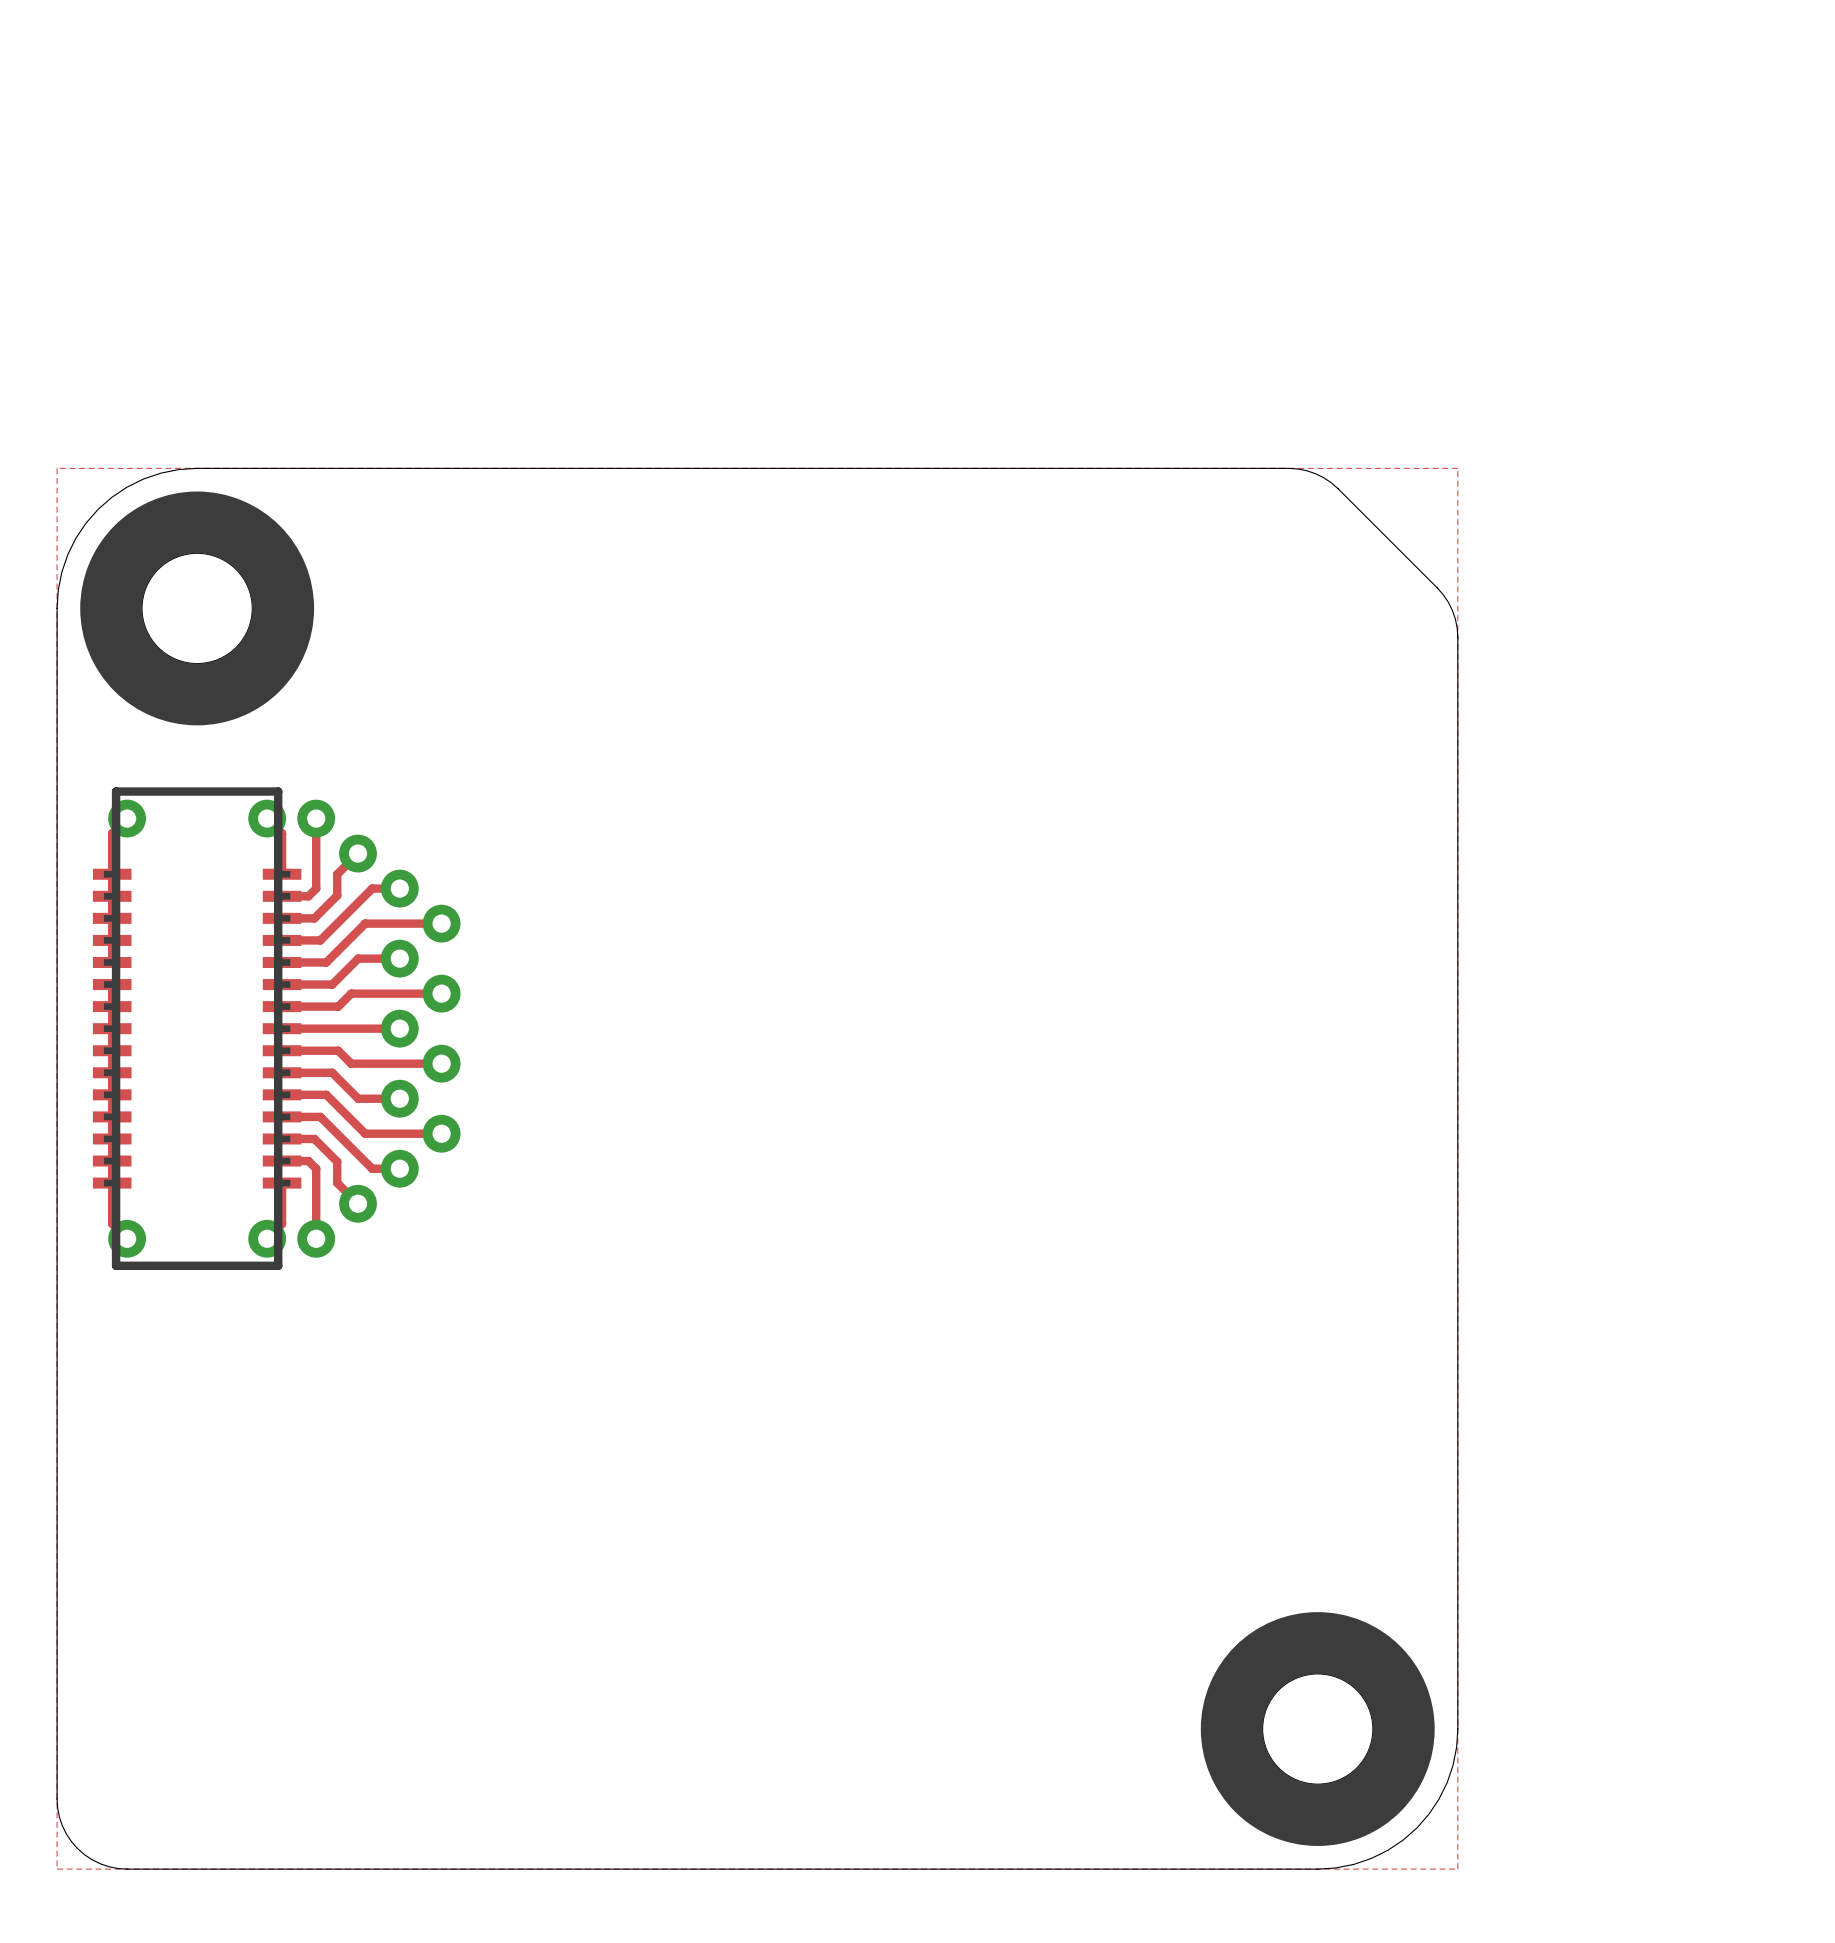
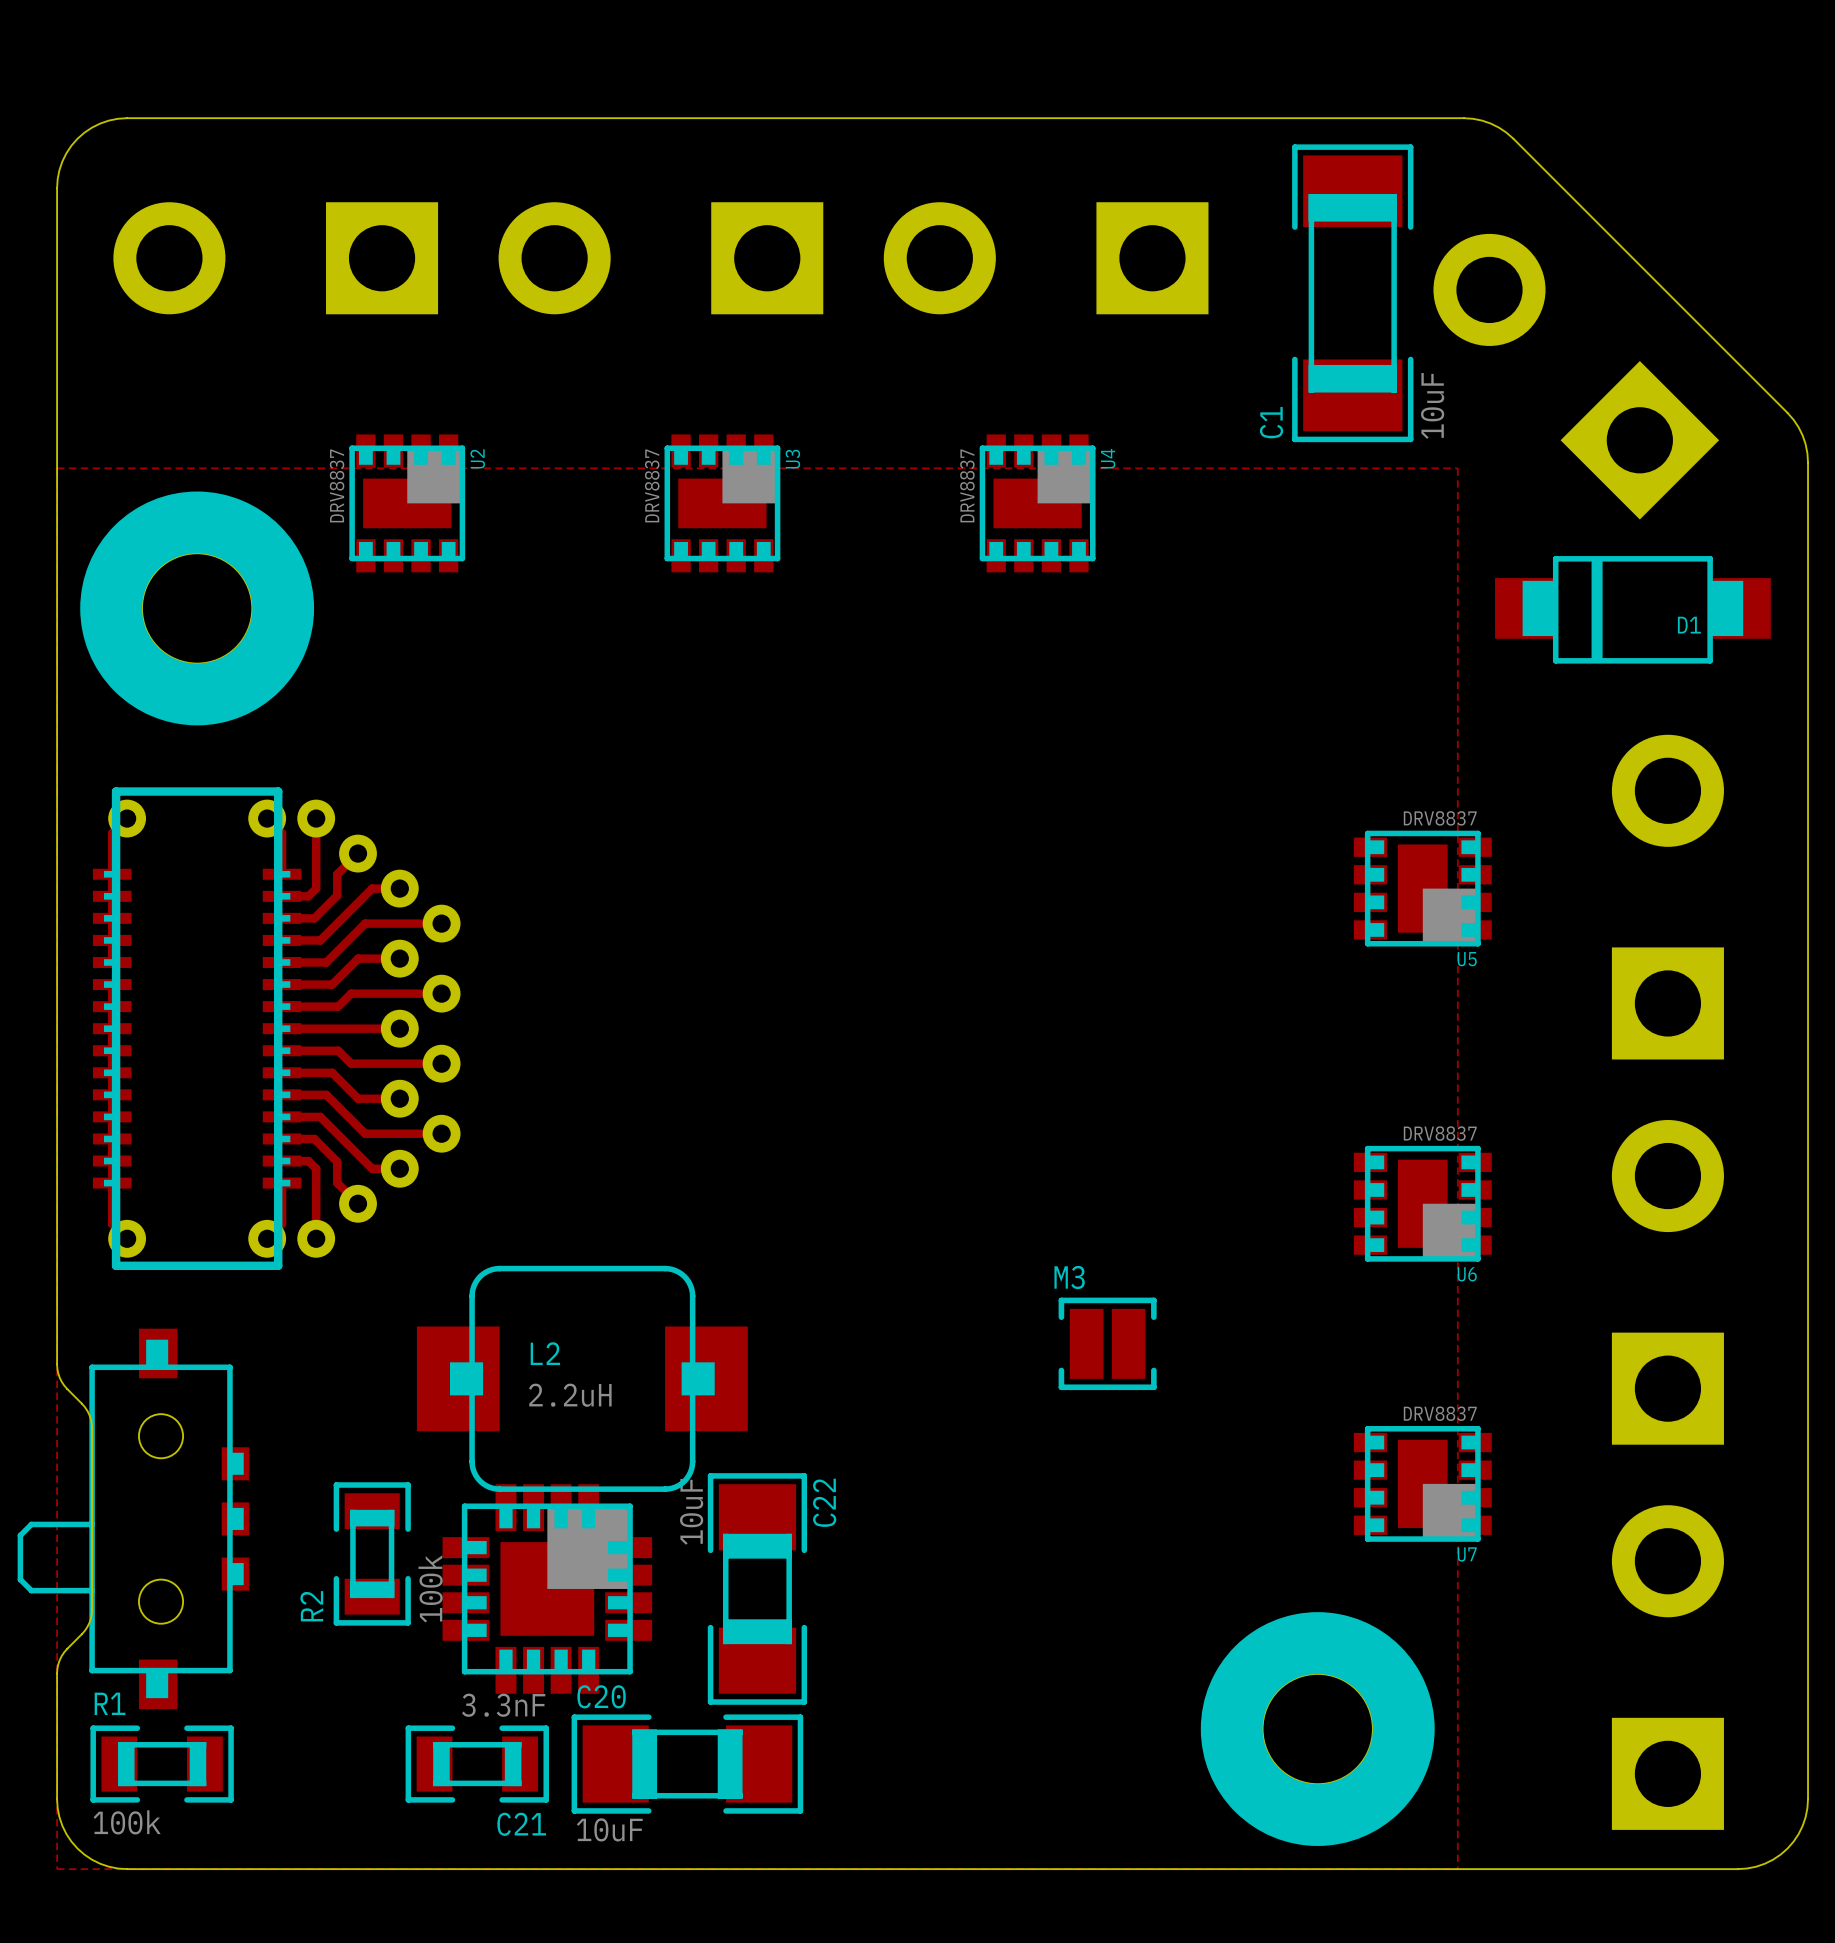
part: none -> (275, 258)
part: none -> (660, 258)
part: none -> (1046, 258)
C1: none -> 10uF (1352, 293)
part: none -> (1576, 376)
U2: none -> DRV8837 (407, 503)
U3: none -> DRV8837 (722, 503)
U4: none -> DRV8837 (1037, 503)
board edge: (57, 608) (61, 572) (67, 554) (86, 523) (98, 509) (111, 497) (143, 479) (178, 469) (1288, 468) (1315, 473) (1338, 488) (1443, 594) (1452, 610) (1457, 628) (1457, 1729) (1453, 1765) (1447, 1782) (1428, 1814) (1416, 1828) (1403, 1840) (1371, 1858) (1354, 1864) (1317, 1869) -> (57, 608) (57, 179) (62, 161) (71, 145) (92, 127) (108, 120) (127, 118) (1463, 118) (1490, 123) (1513, 138) (1787, 412) (1798, 427) (1807, 453) (1807, 1808) (1798, 1834) (1787, 1848) (1772, 1859) (1747, 1868) (1317, 1869)
D1: none -> (1632, 609)
U5: none -> DRV8837 (1422, 888)
part: none -> (1667, 897)
U6: none -> DRV8837 (1422, 1203)
part: none -> (1667, 1282)
M3: none -> (1107, 1343)
board edge: (57, 1364) (57, 1673) -> (57, 1364) (61, 1381) (87, 1410) (92, 1428) (91, 1614) (84, 1630) (61, 1656) (57, 1673)
L2: none -> 2.2uH (582, 1378)
U7: none -> DRV8837 (1422, 1483)
part: none -> (133, 1518)
R2: none -> 100k (372, 1553)
part: none -> (547, 1588)
C22: none -> 10uF (757, 1588)
part: none -> (1667, 1667)
R1: none -> 100k (162, 1764)
C21: none -> 3.3nF (477, 1764)
C20: none -> 10uF (687, 1764)

